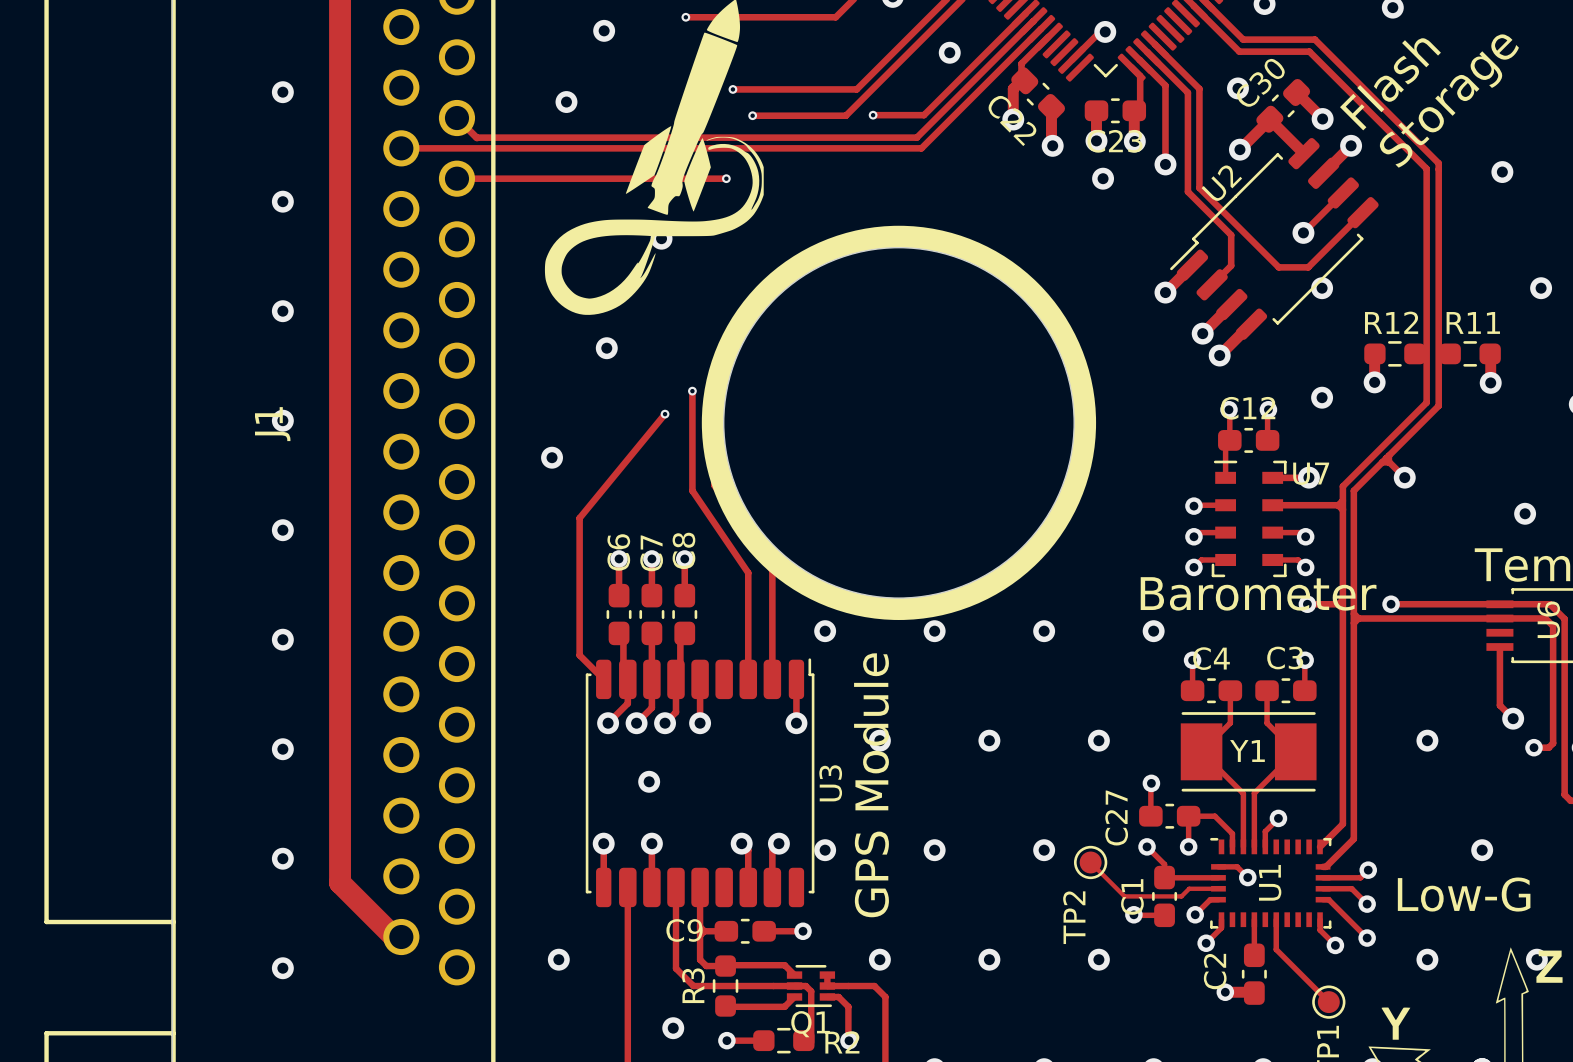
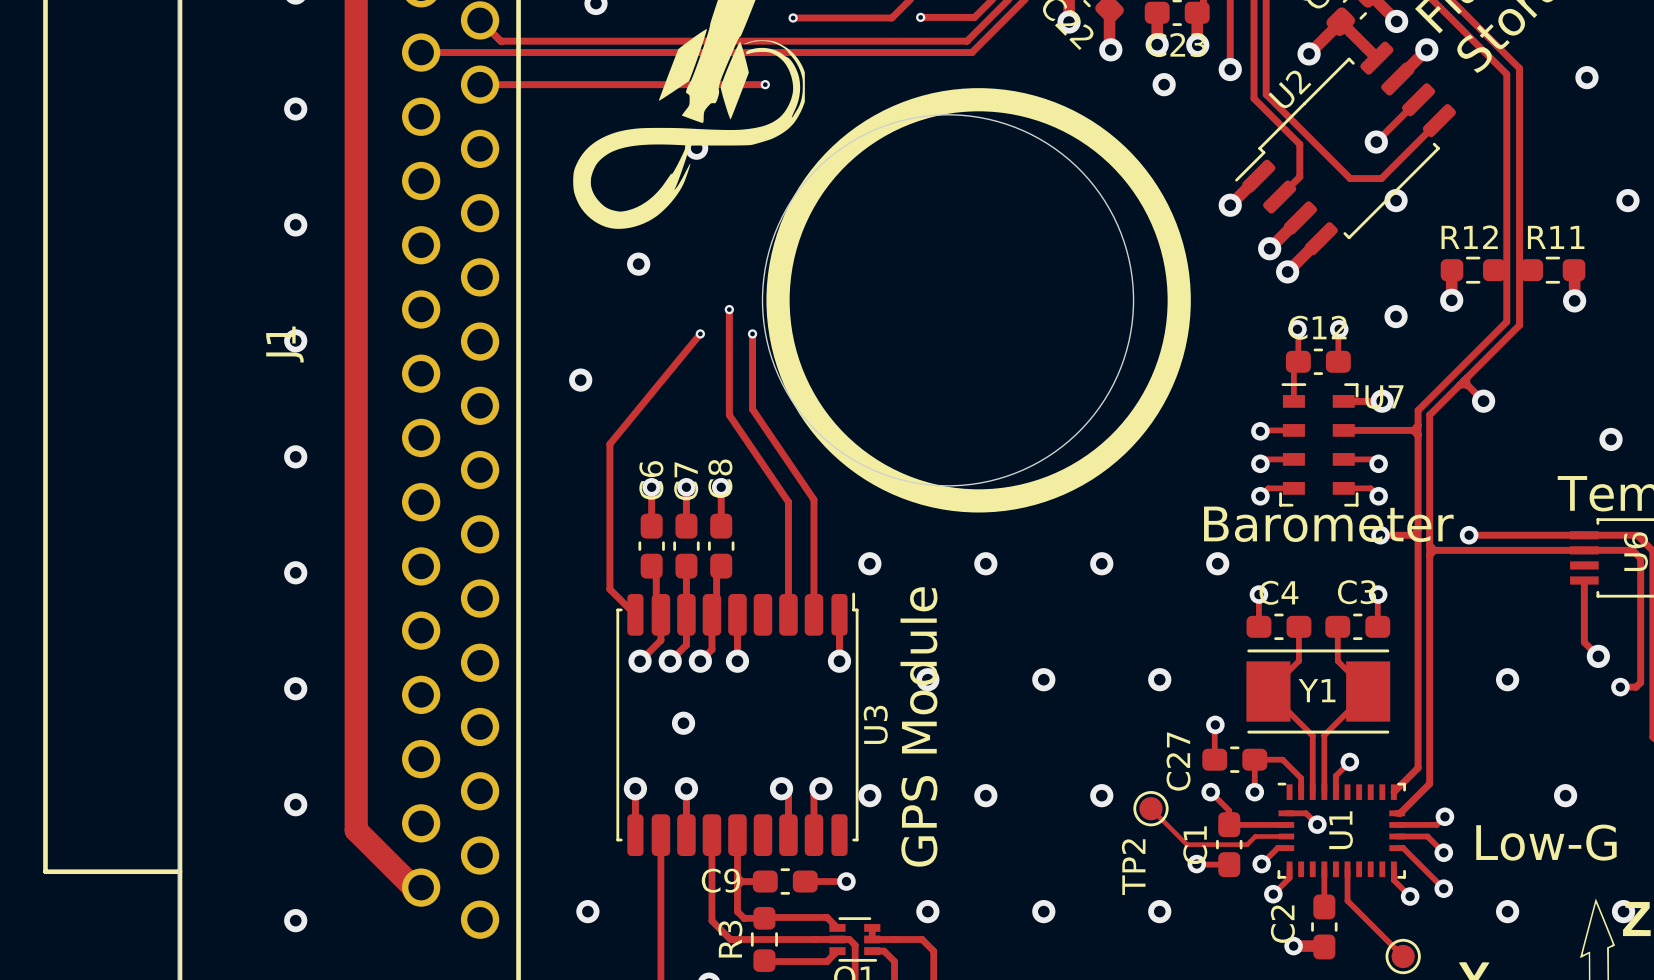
drawing: none -> [766, 88, 1191, 513]
drawing: [701, 225, 1097, 620] -> none
round board edge position: (898, 422) -> (948, 300)

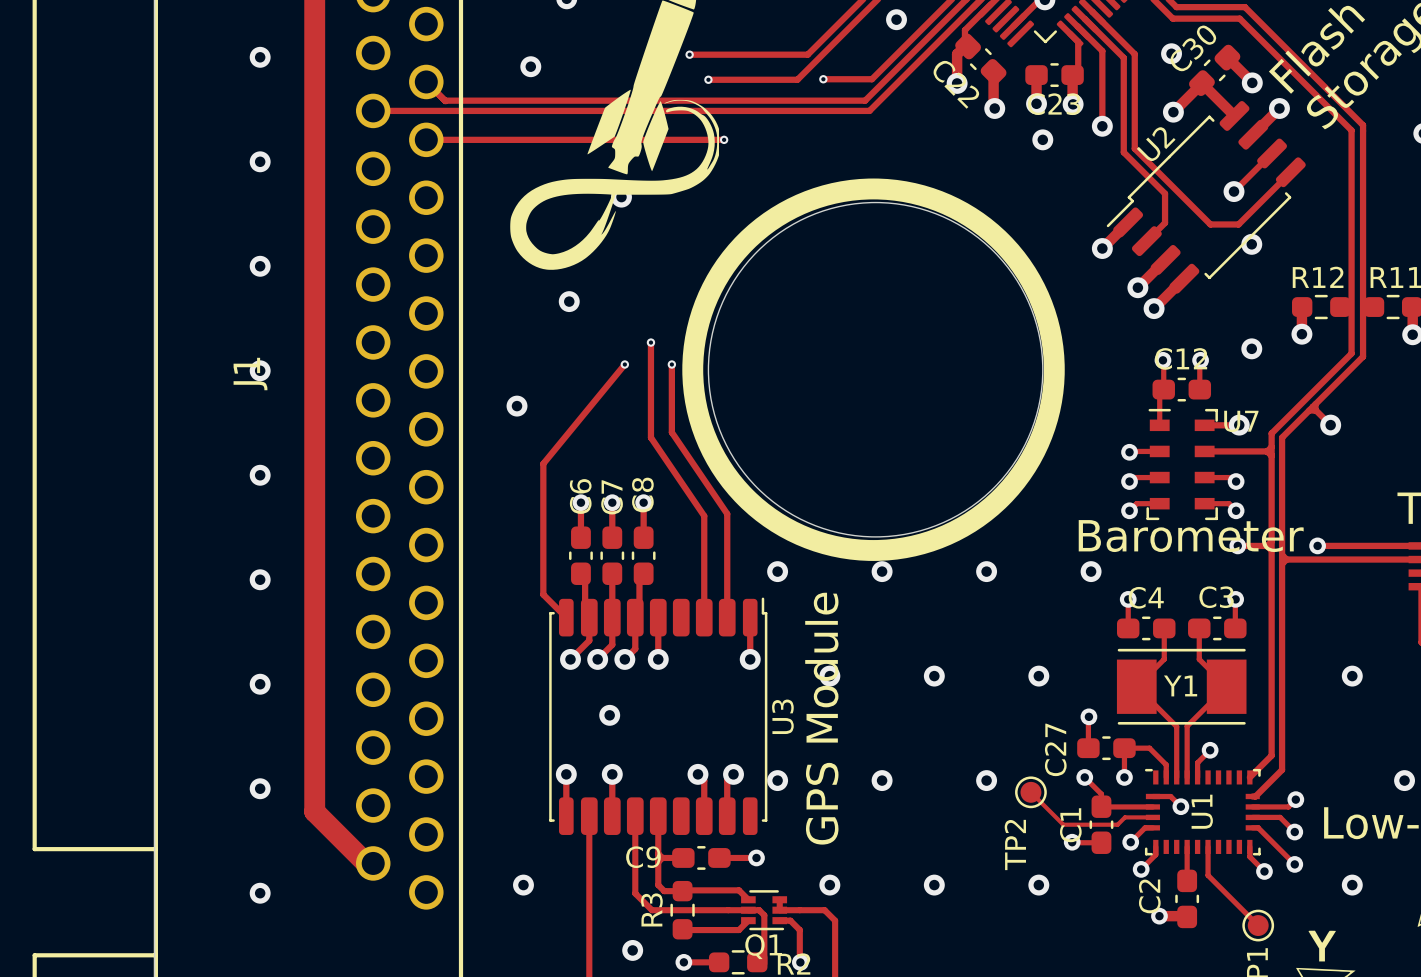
track: none -> (683, 139) (724, 139)
via position: (765, 84) -> (724, 139)
round board edge position: (948, 300) -> (875, 369)
drawing position: (978, 300) -> (873, 369)

